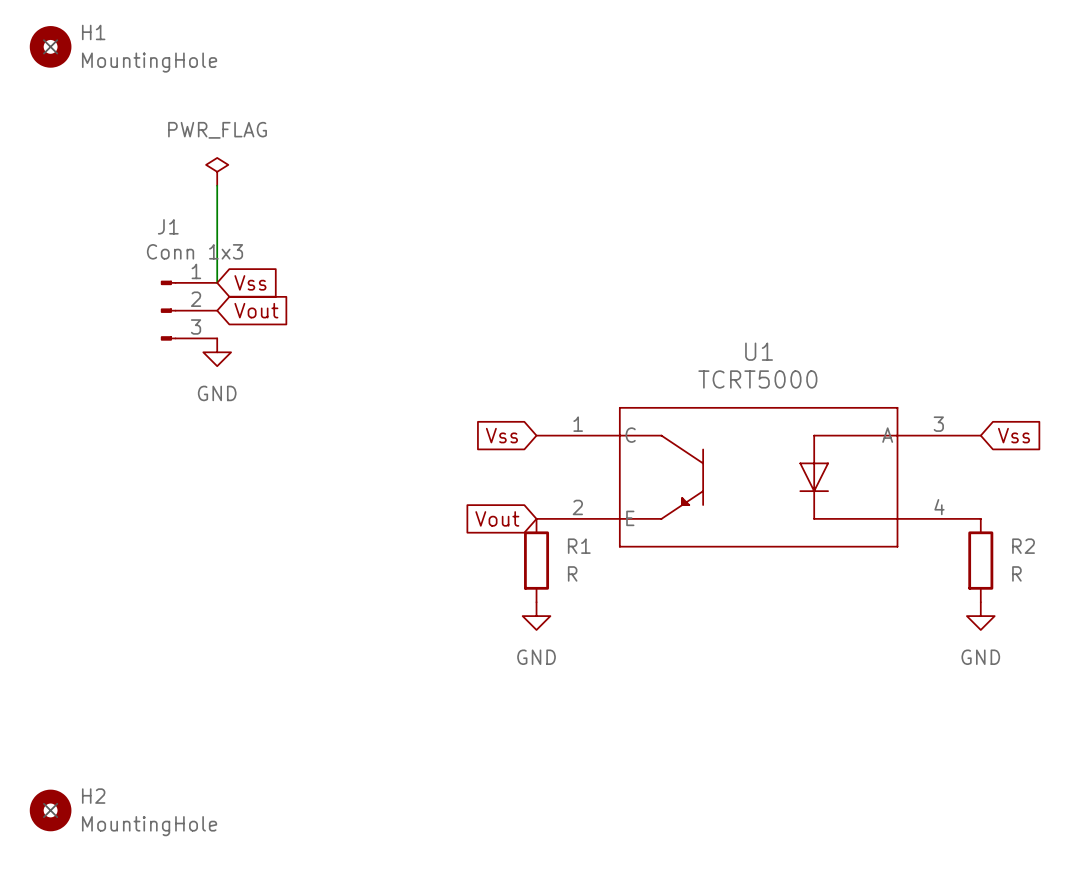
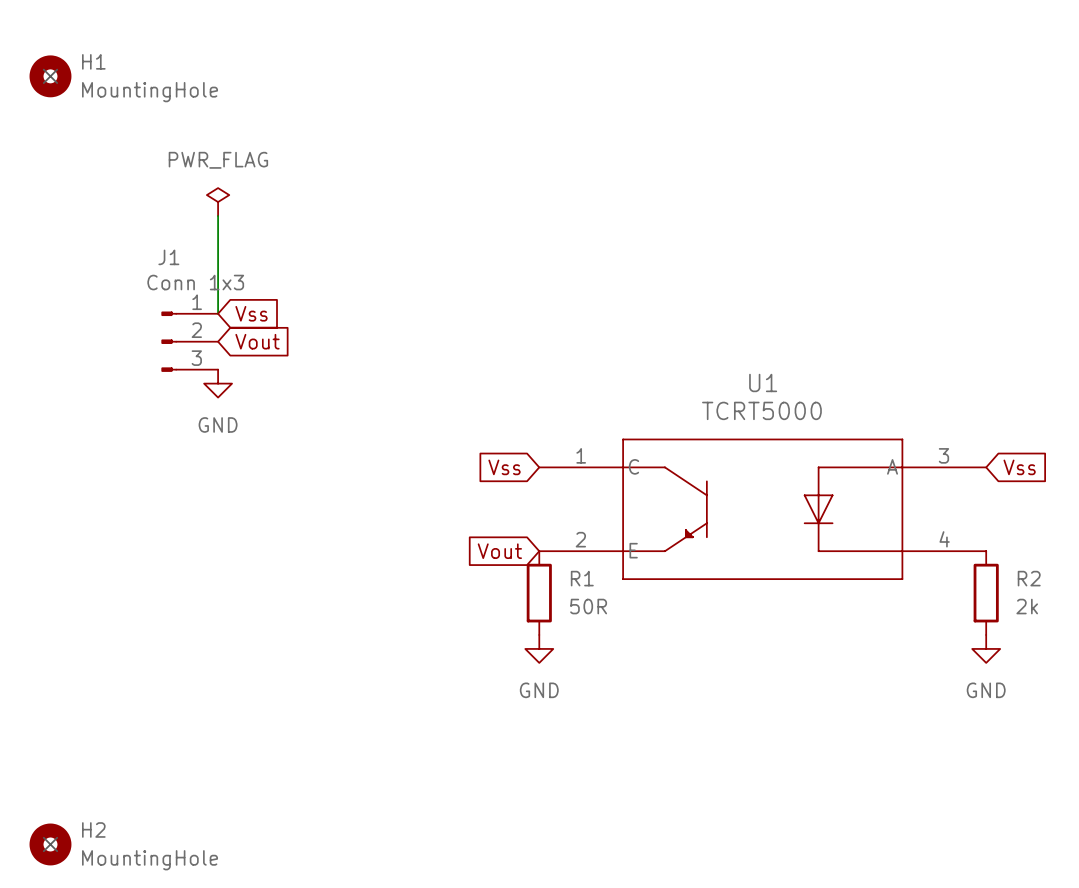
R1 value: R (572, 573) -> 50R (588, 606)
R2 value: R (1016, 573) -> 2k (1027, 606)

